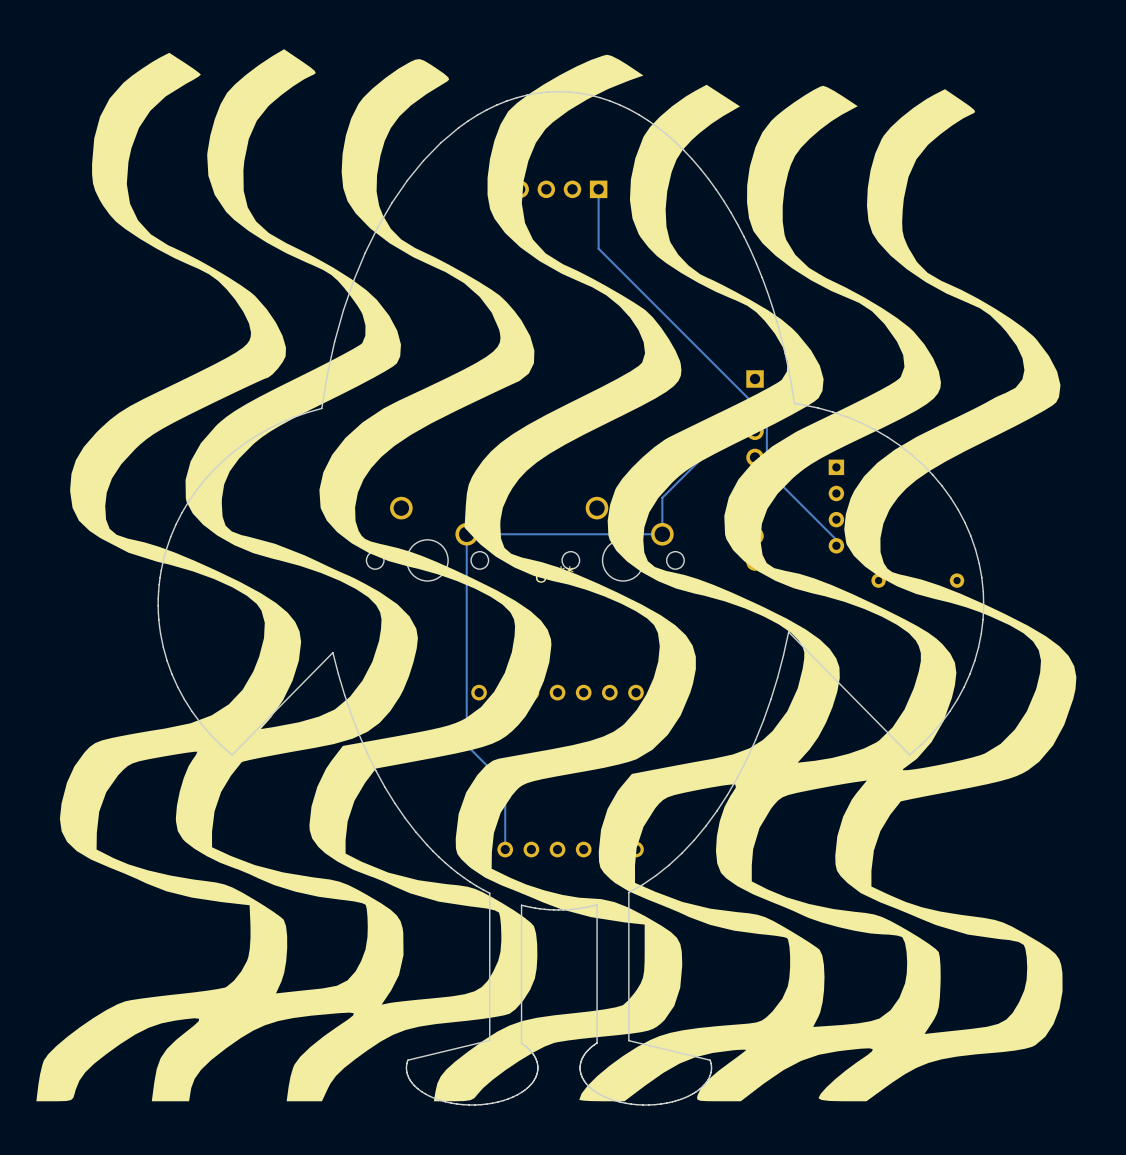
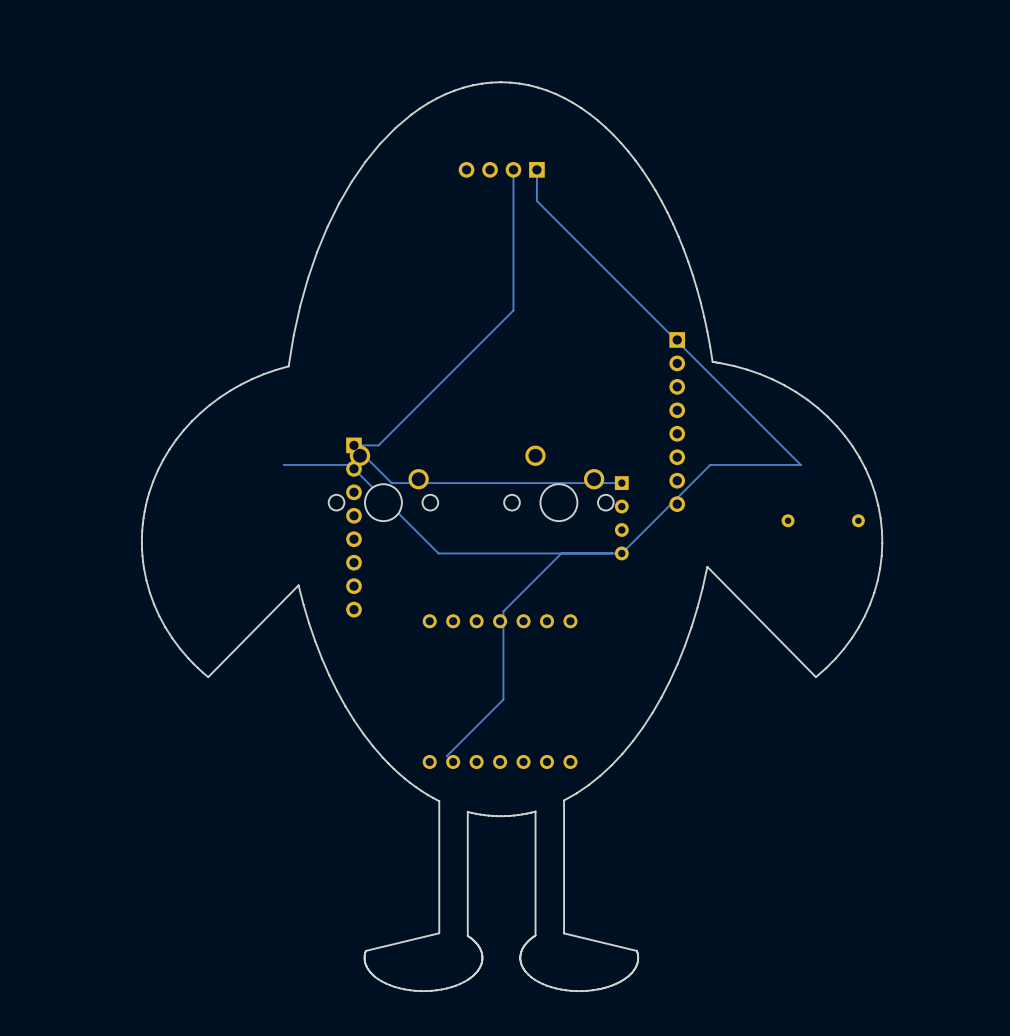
track: none -> (513, 174) (513, 310) (378, 445) (353, 445) (391, 483) (621, 483)
track: (598, 224) (598, 248) (766, 416) (766, 470) (836, 539) -> (536, 201) (800, 464) (710, 464) (621, 553) (438, 553) (350, 464) (283, 464)
track: (755, 405) (662, 497) (662, 534) (466, 534) (466, 745) (505, 783) (505, 849) -> none
part position: (836, 506) -> (621, 518)
part: (556, 575) -> none
part: none -> (353, 527)
track: none -> (561, 553) (503, 611) (503, 699) (446, 756)

